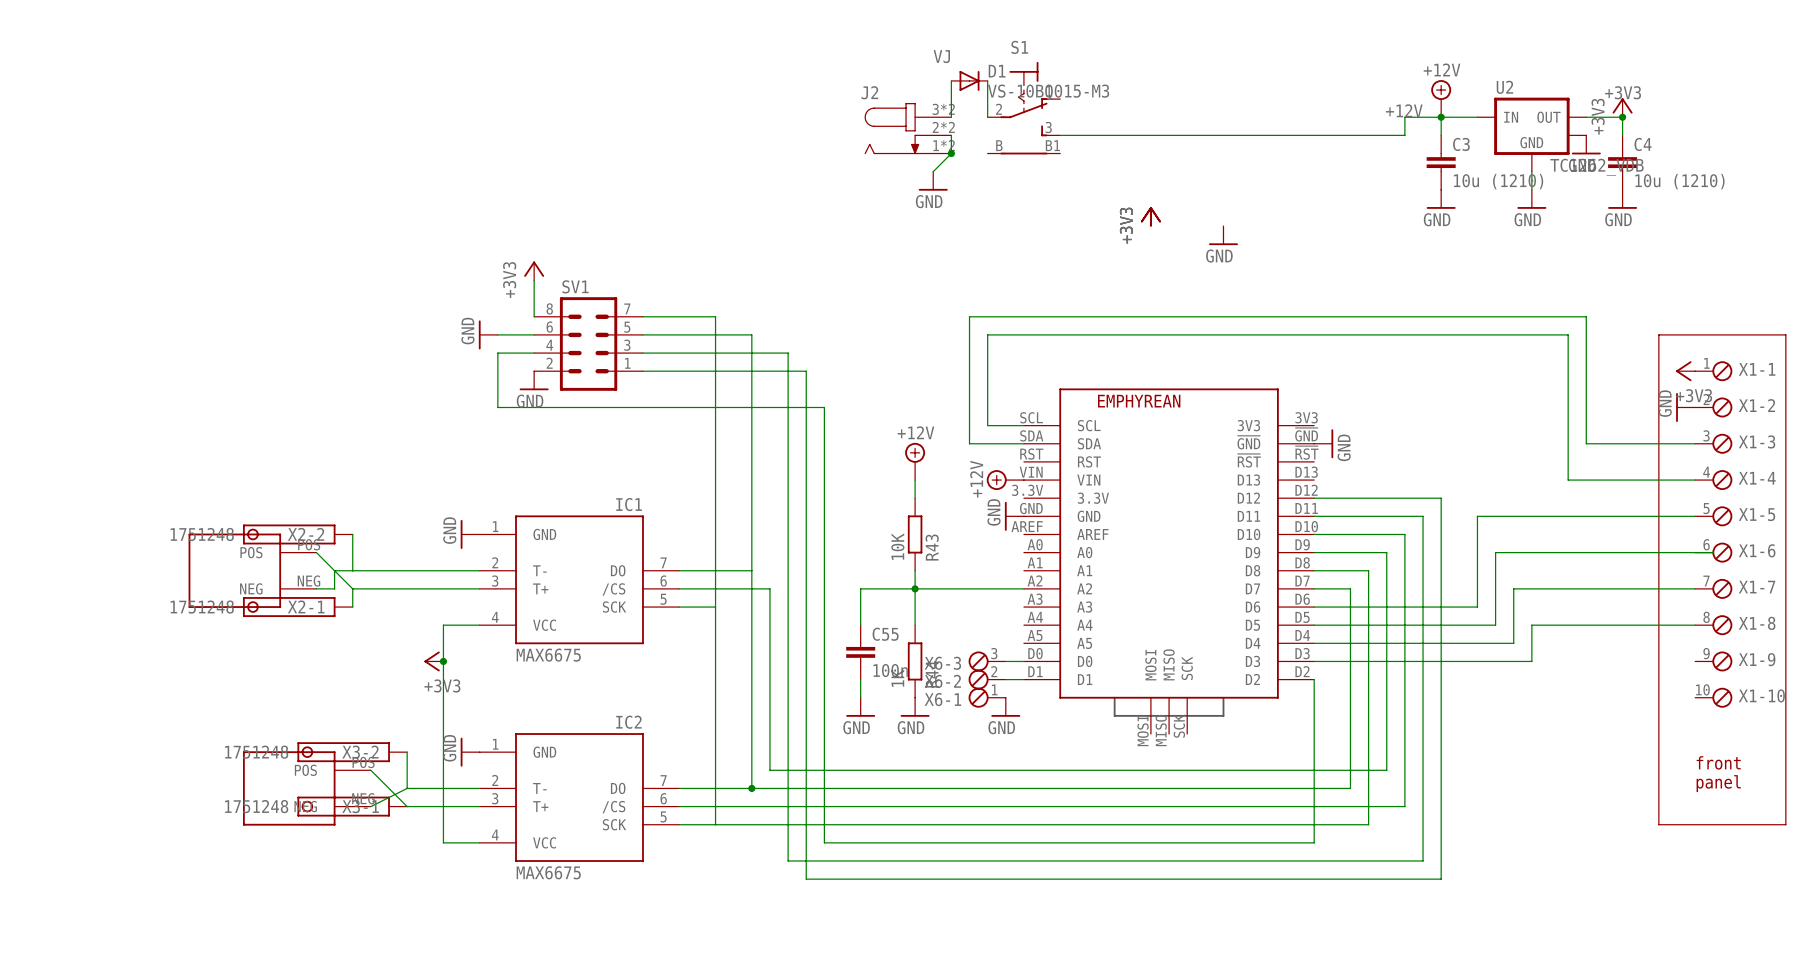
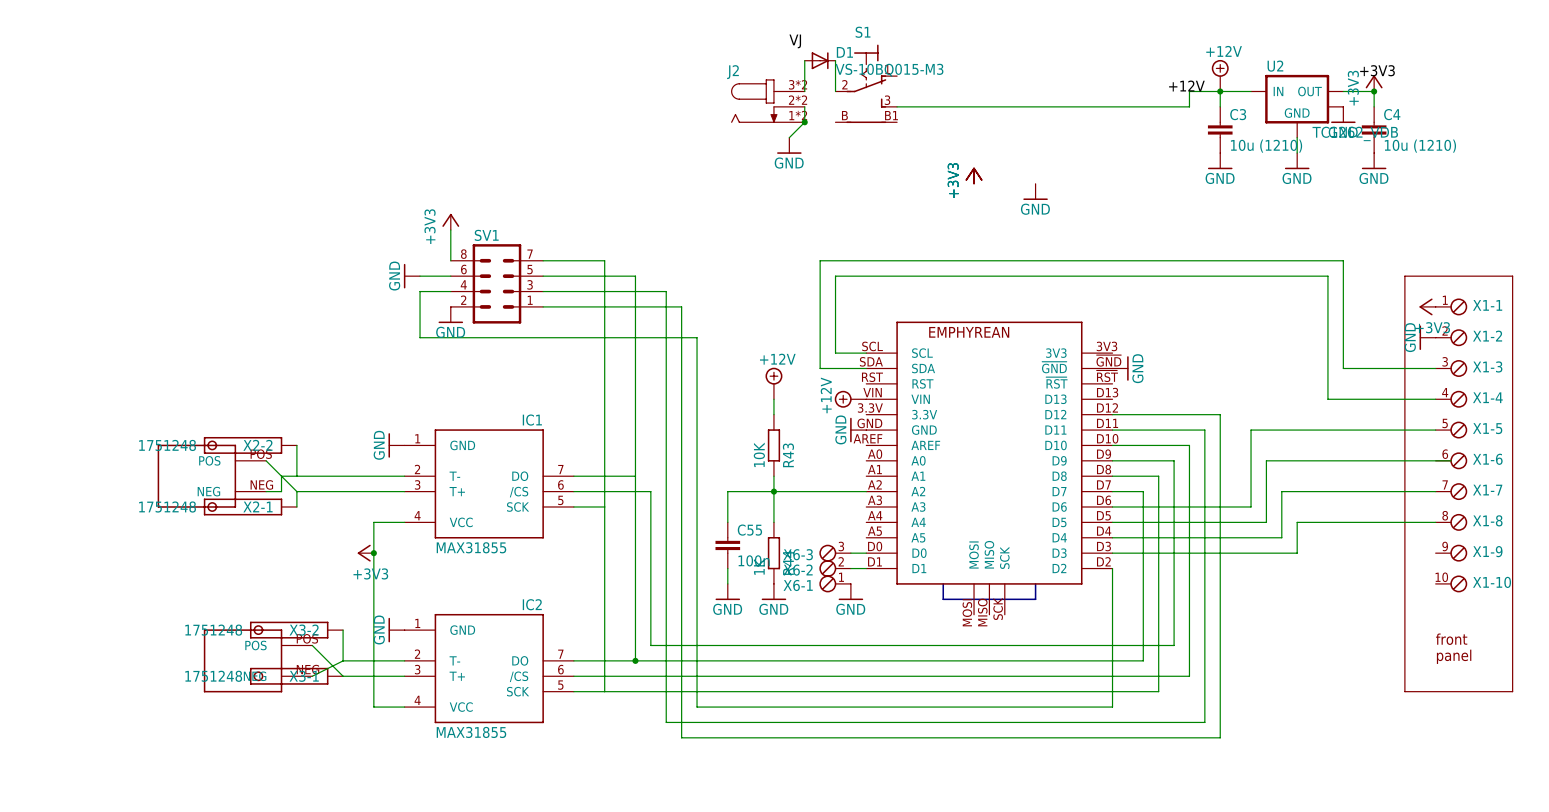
IC1 value: MAX6675 (548, 655) -> MAX31855 (471, 547)
IC2 value: MAX6675 (548, 872) -> MAX31855 (471, 732)

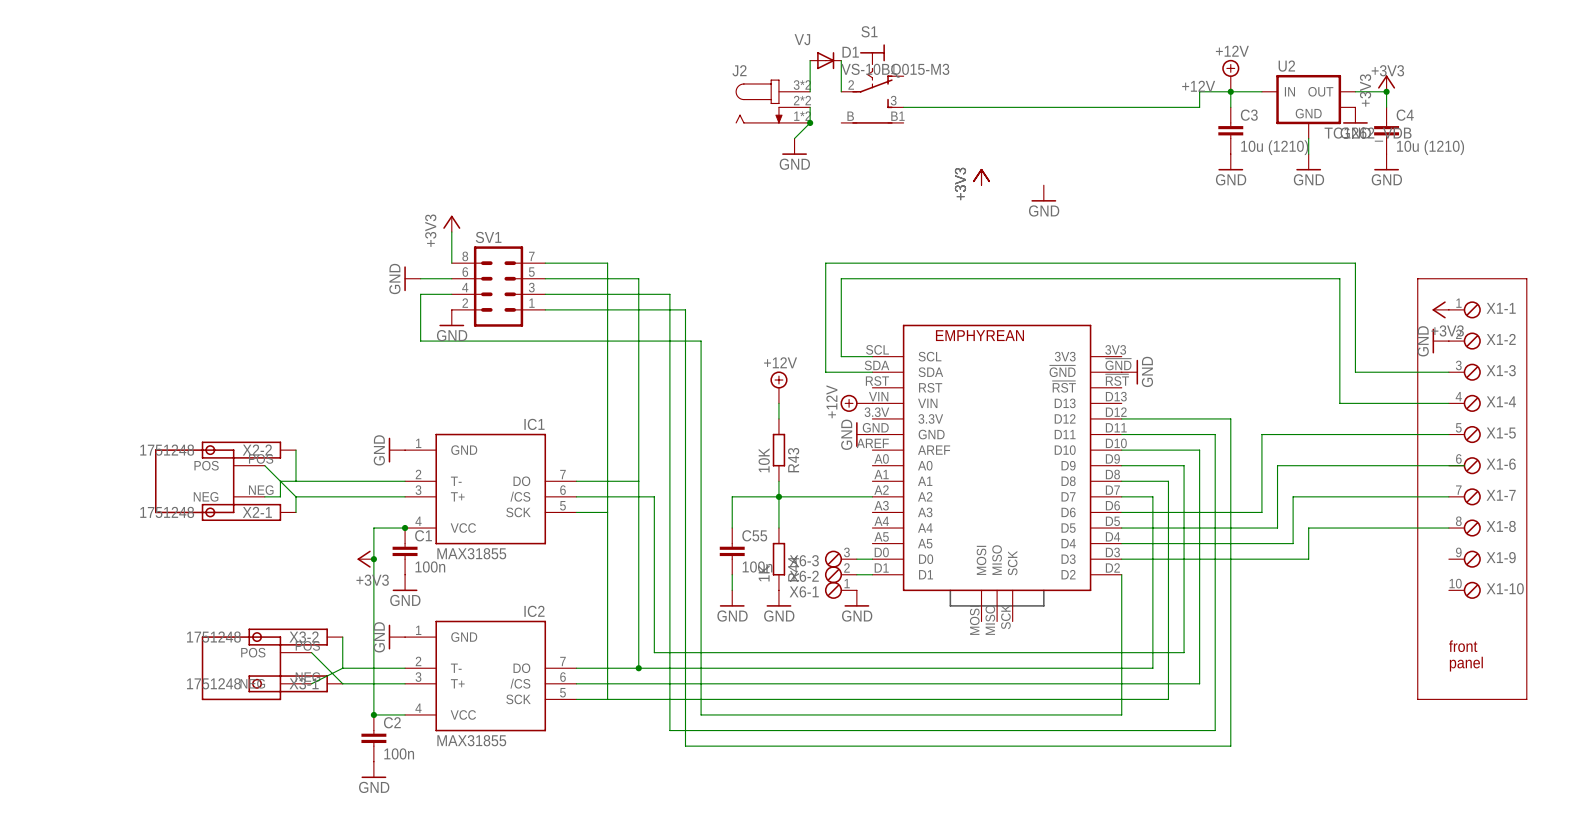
junction: none -> (405, 528)
C1: none -> 100n (405, 551)
power symbol: none -> GND (405, 582)
junction: none -> (373, 714)
C2: none -> 100n (373, 738)
power symbol: none -> GND (373, 769)

